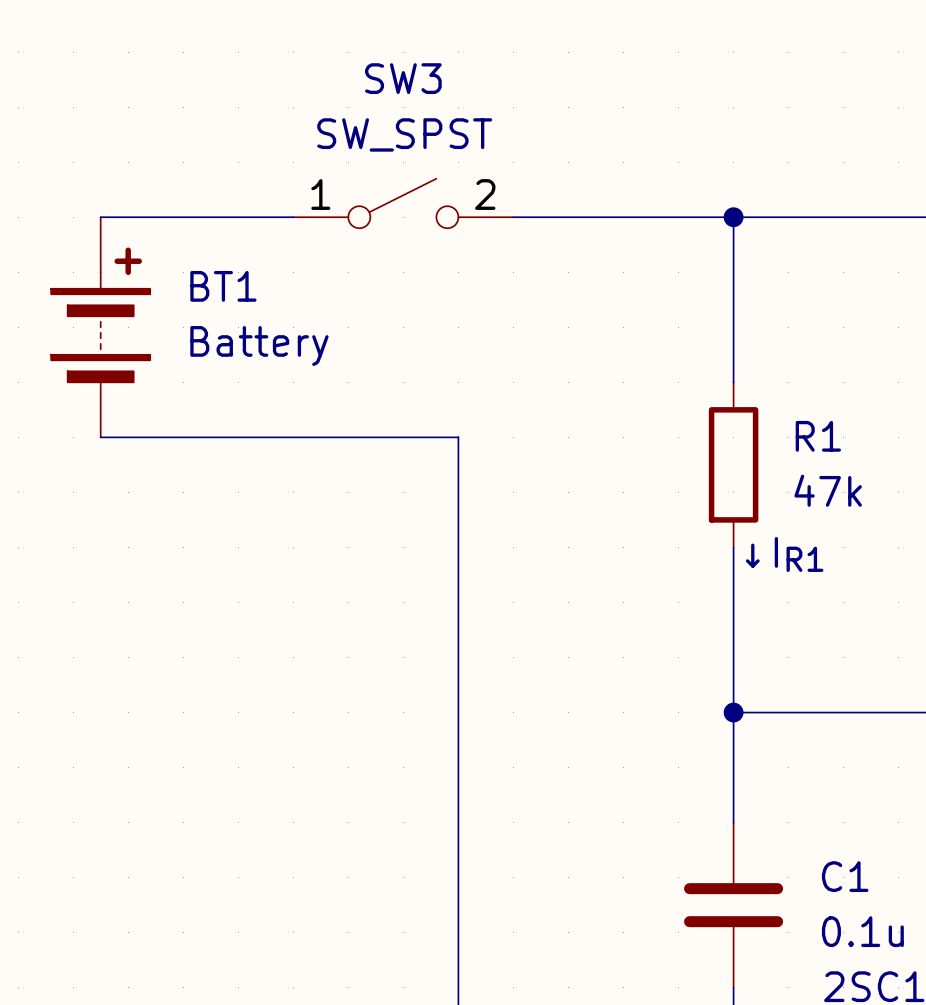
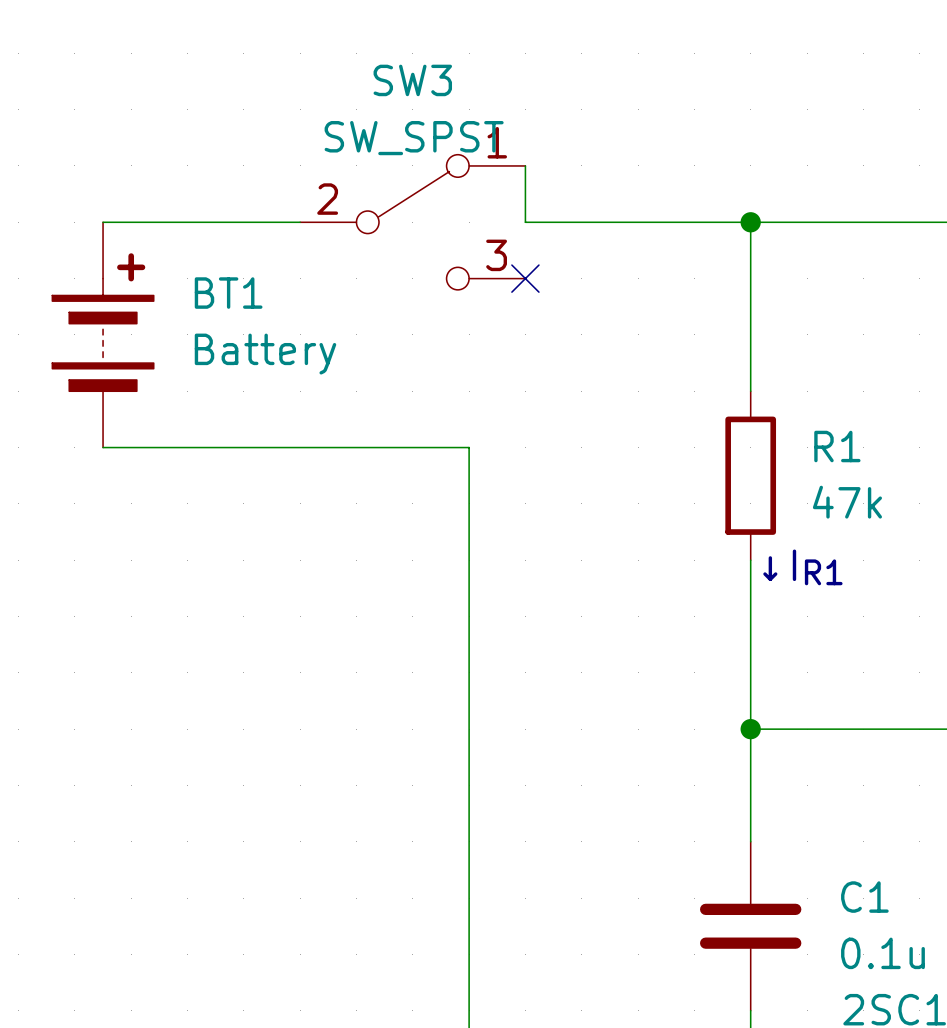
wire: none -> (525, 165) (525, 222)
SW3 symbol: [293, 178, 514, 229] -> [300, 154, 526, 290]
no-connect mark: none -> (525, 278)

